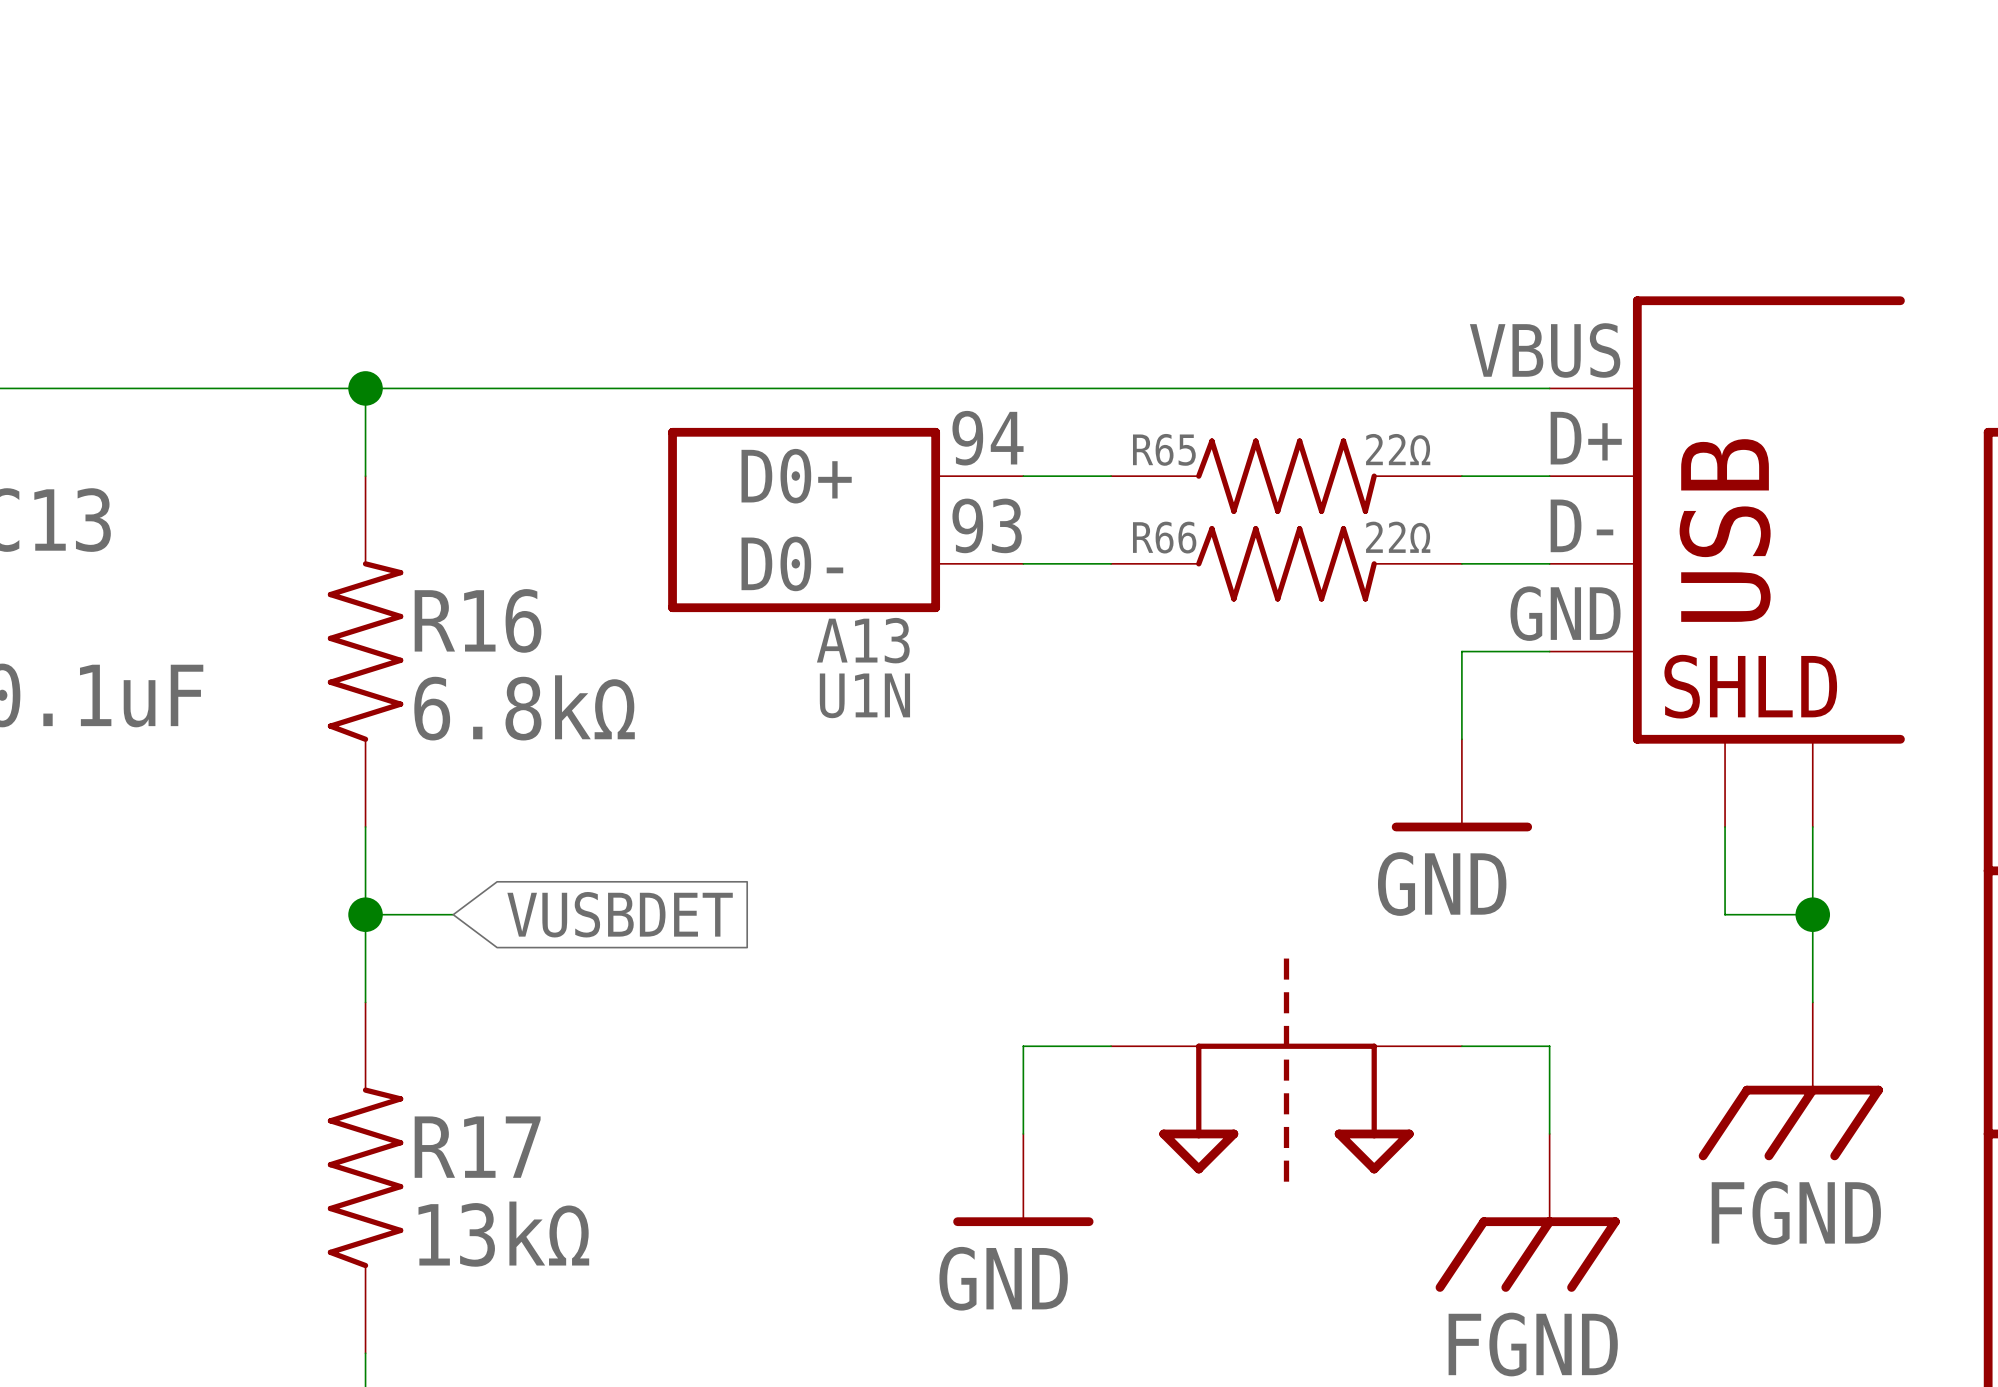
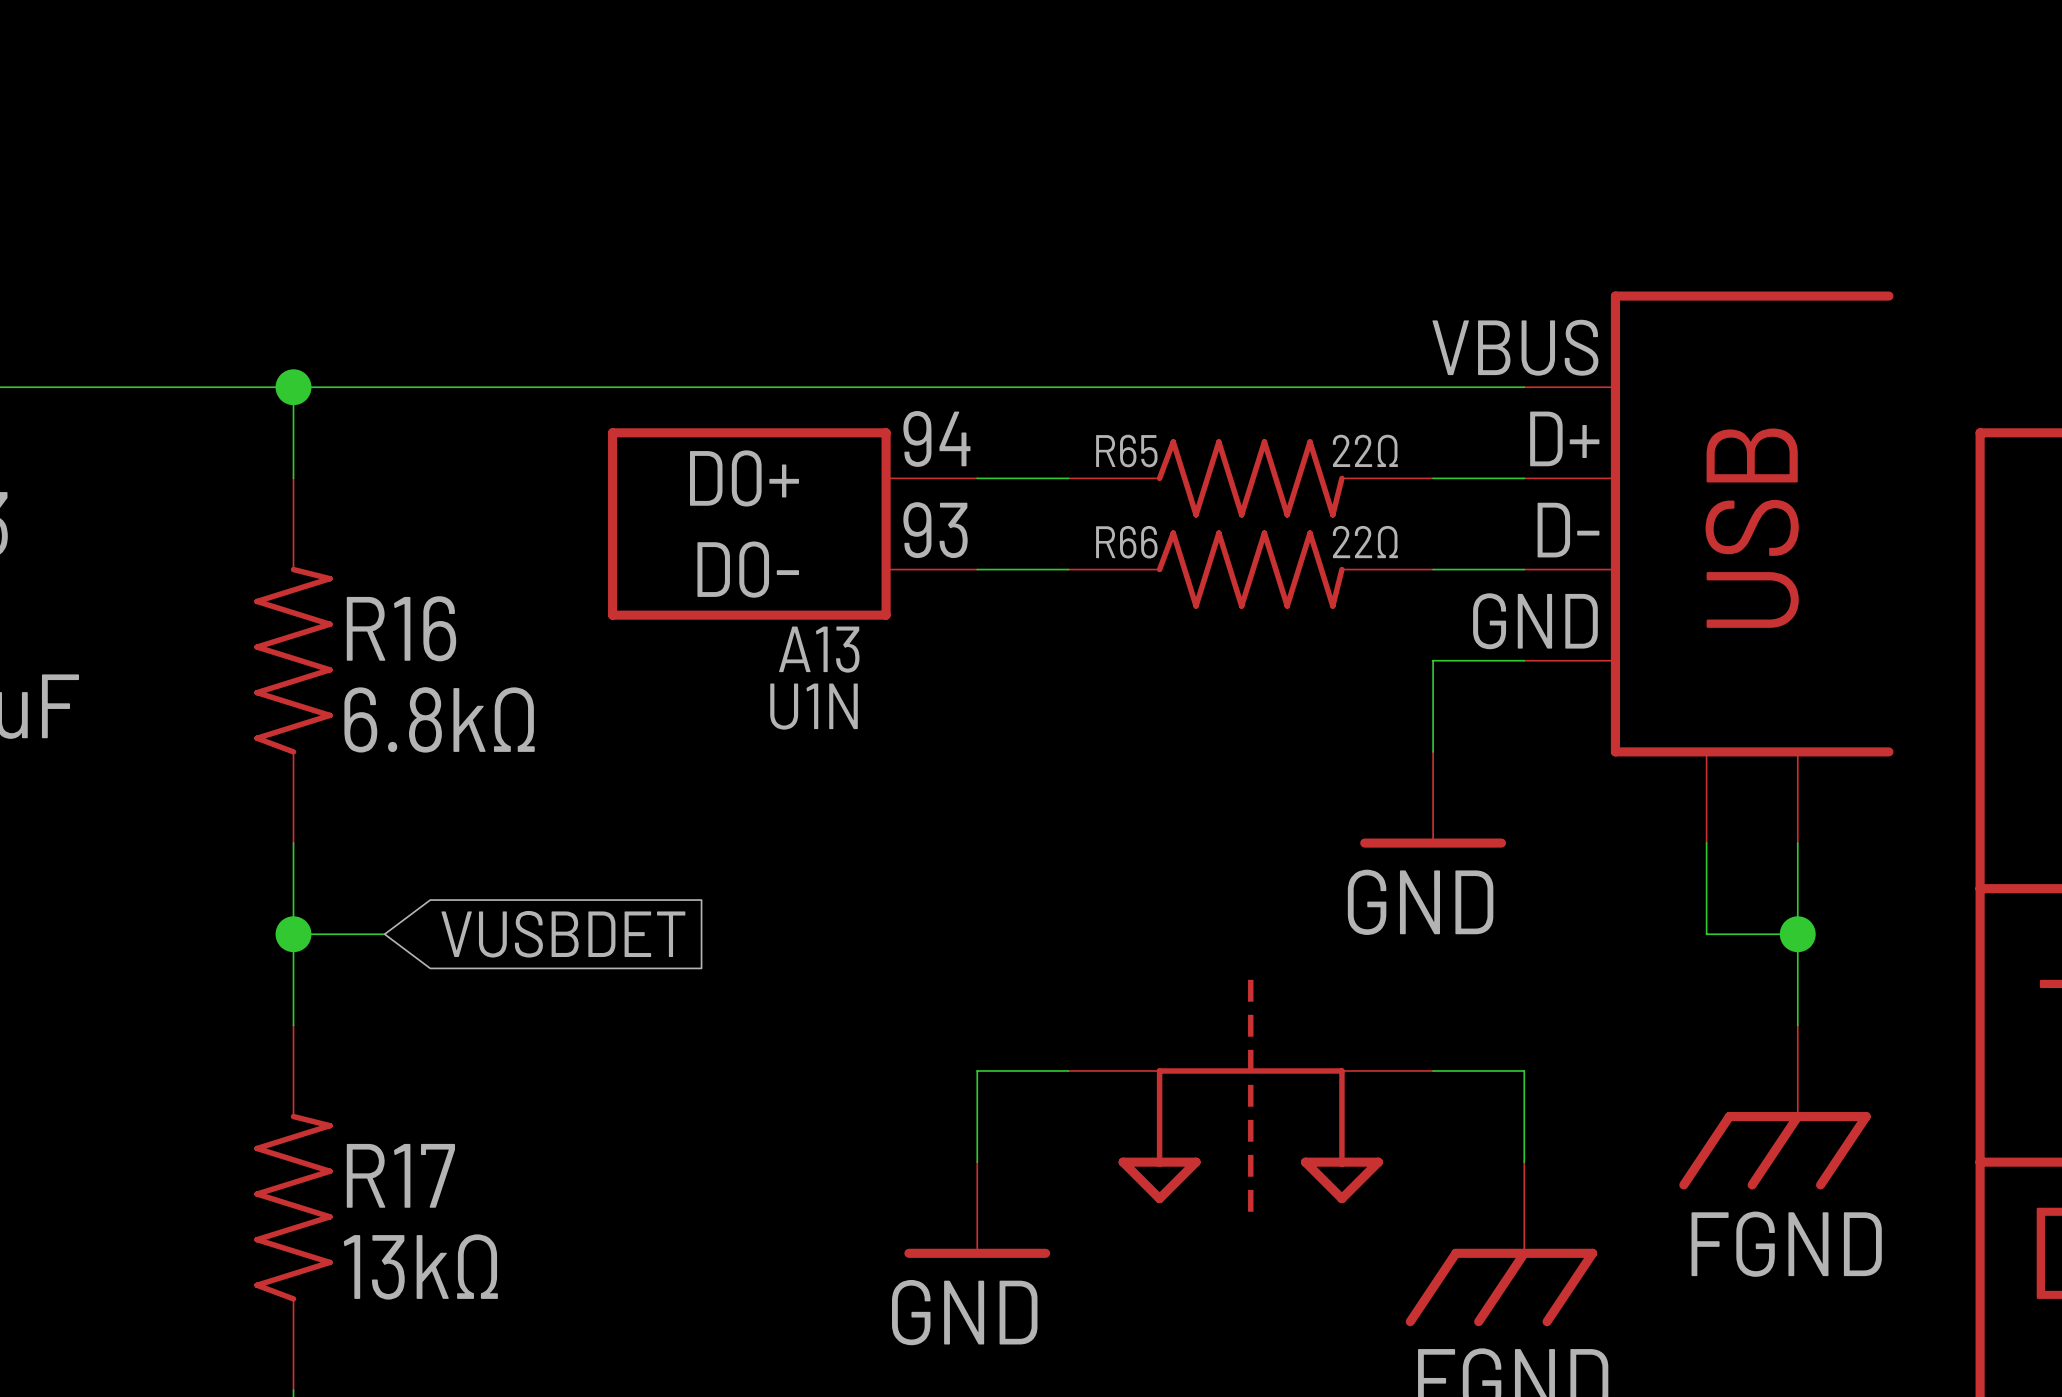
part text position: USB (1725, 530) -> USB (1752, 528)
part text: SHLD (1750, 686) -> none

